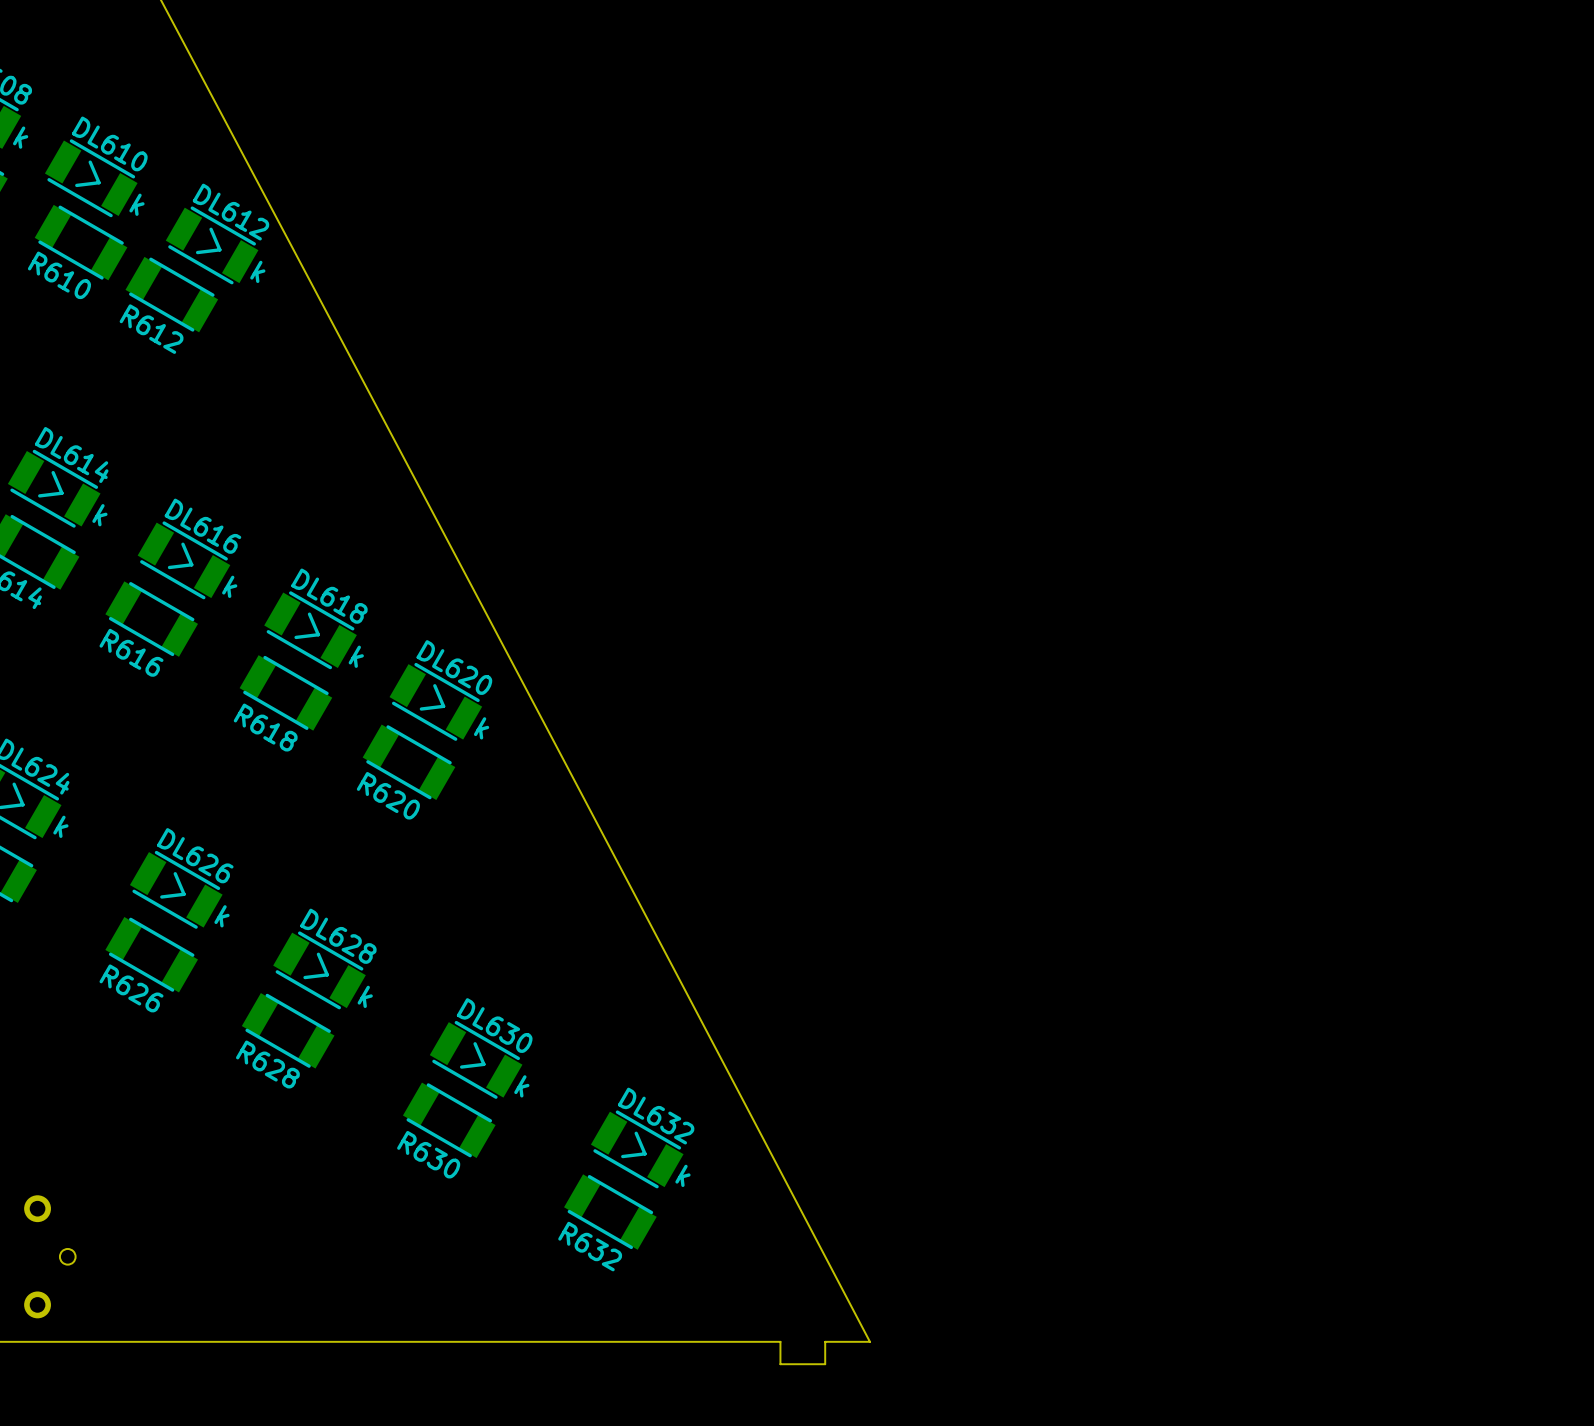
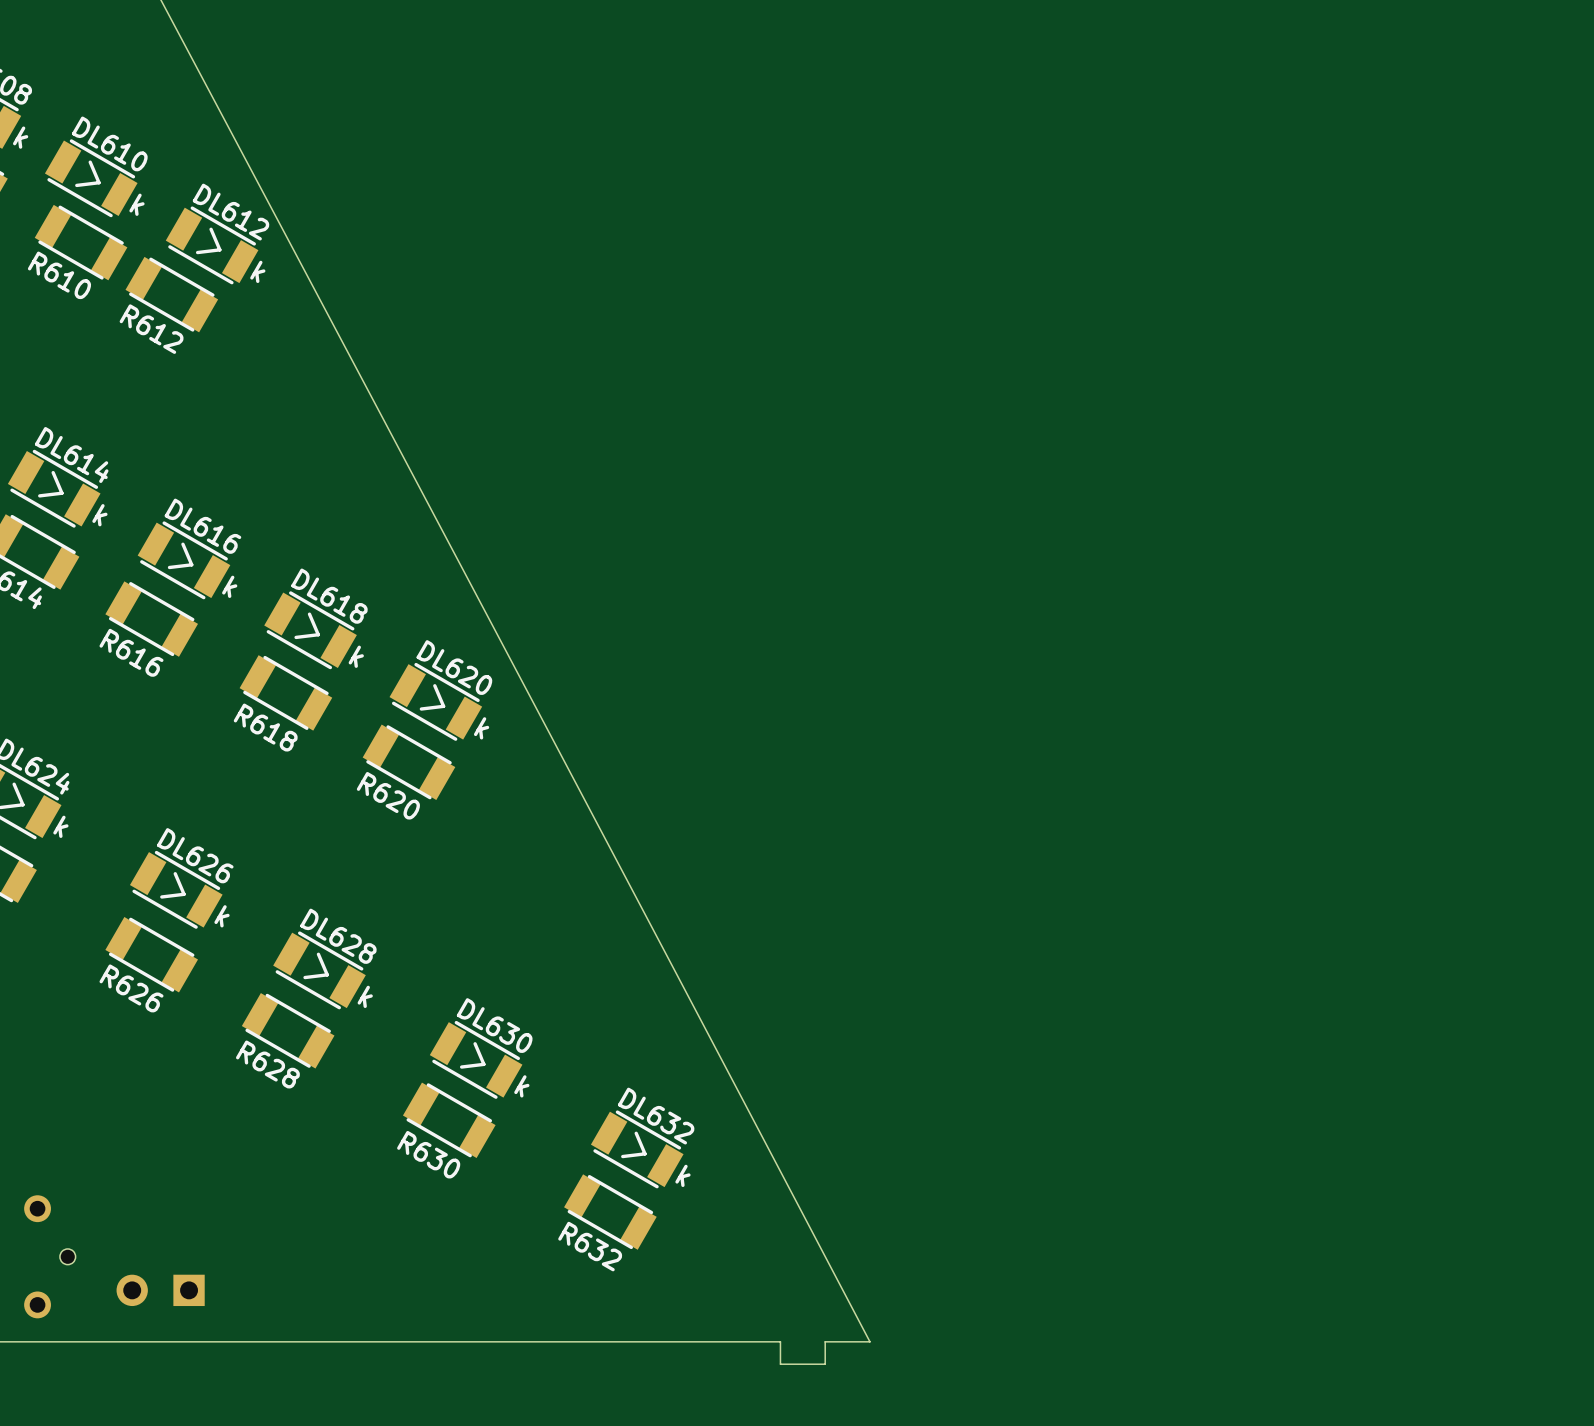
part: none -> (160, 1290)

